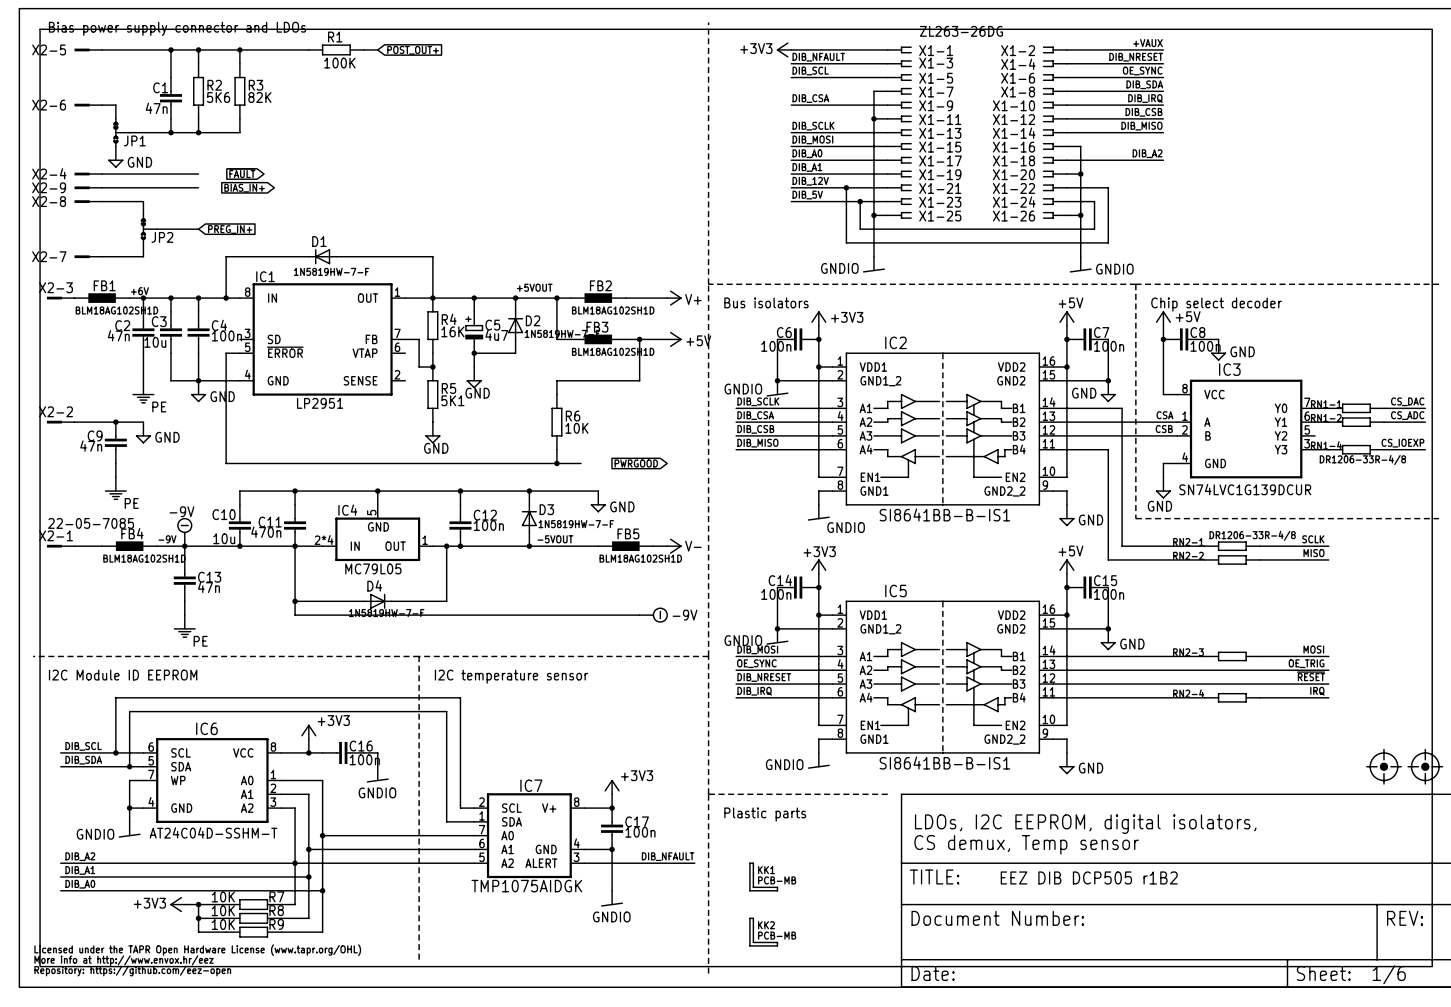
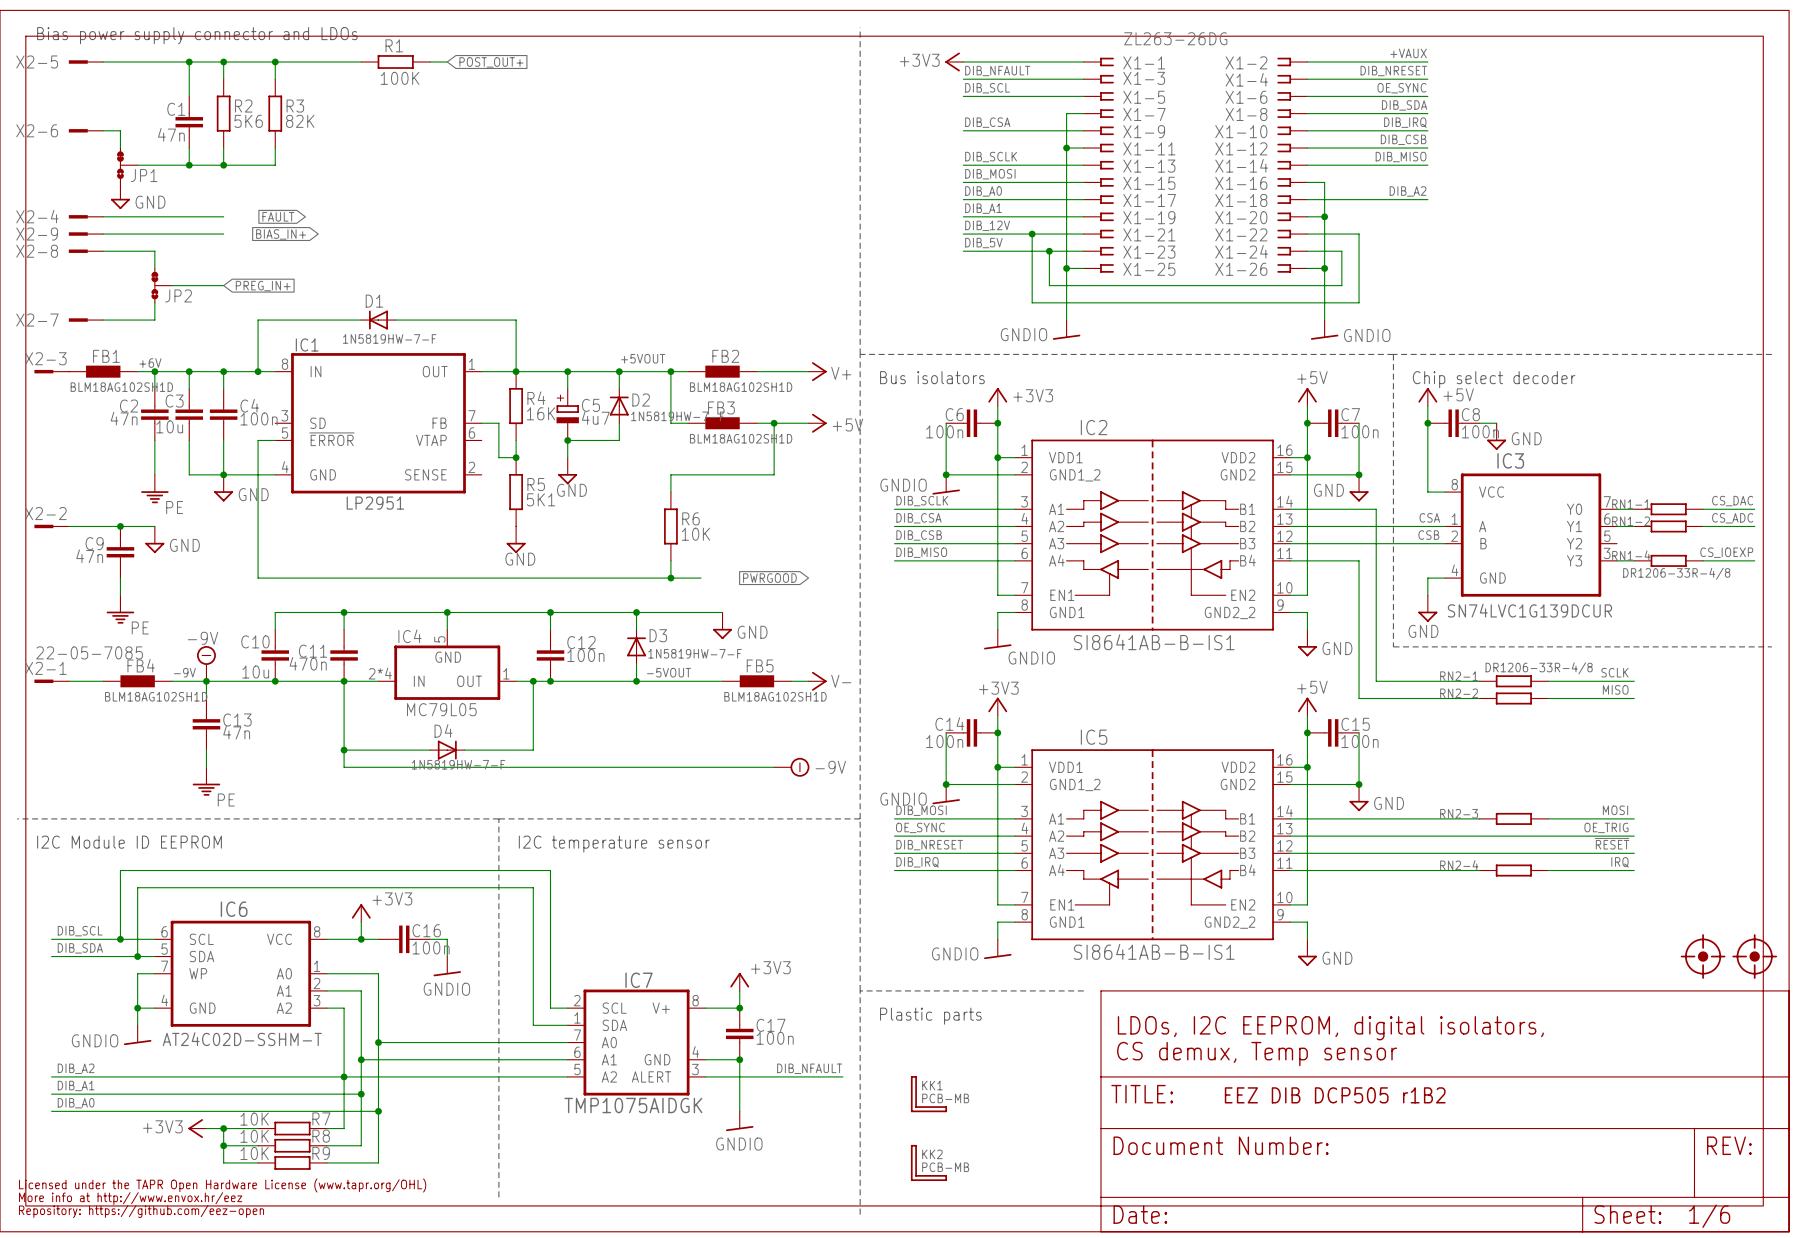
IC2 value: SI8641BB-B-IS1 (944, 514) -> SI8641AB-B-IS1 (1154, 642)
IC5 value: SI8641BB-B-IS1 (944, 763) -> SI8641AB-B-IS1 (1154, 951)
IC6 value: AT24C04D-SSHM-T (213, 832) -> AT24C02D-SSHM-T (242, 1039)

